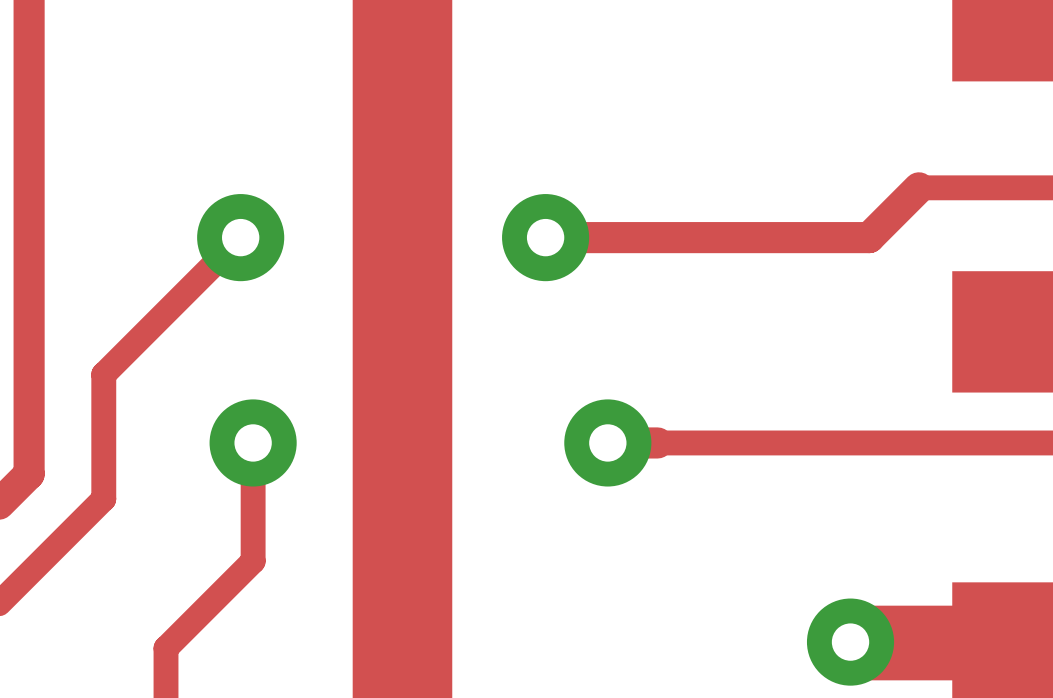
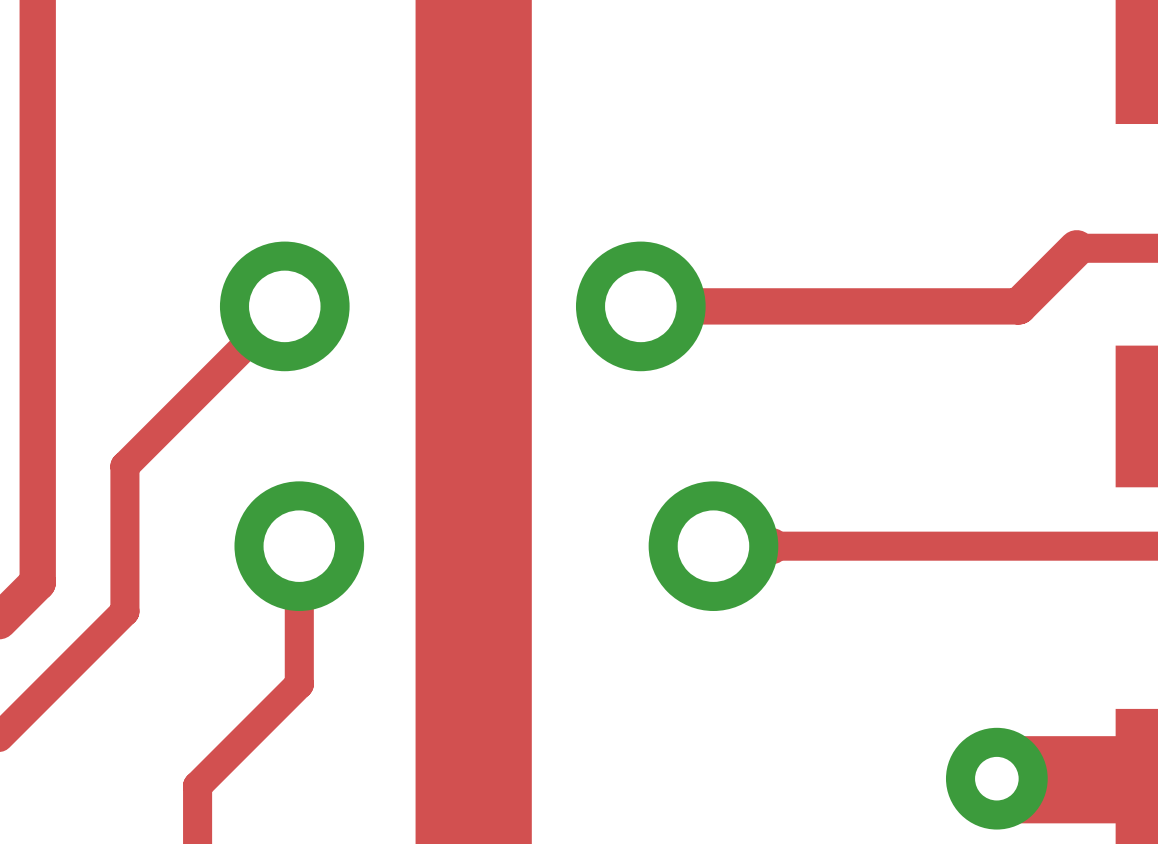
via size: [197, 194, 285, 282] -> [219, 241, 350, 372]
via size: [502, 194, 590, 282] -> [575, 241, 706, 372]
via size: [209, 399, 297, 487] -> [234, 481, 365, 611]
via size: [564, 399, 652, 487] -> [648, 481, 779, 611]

